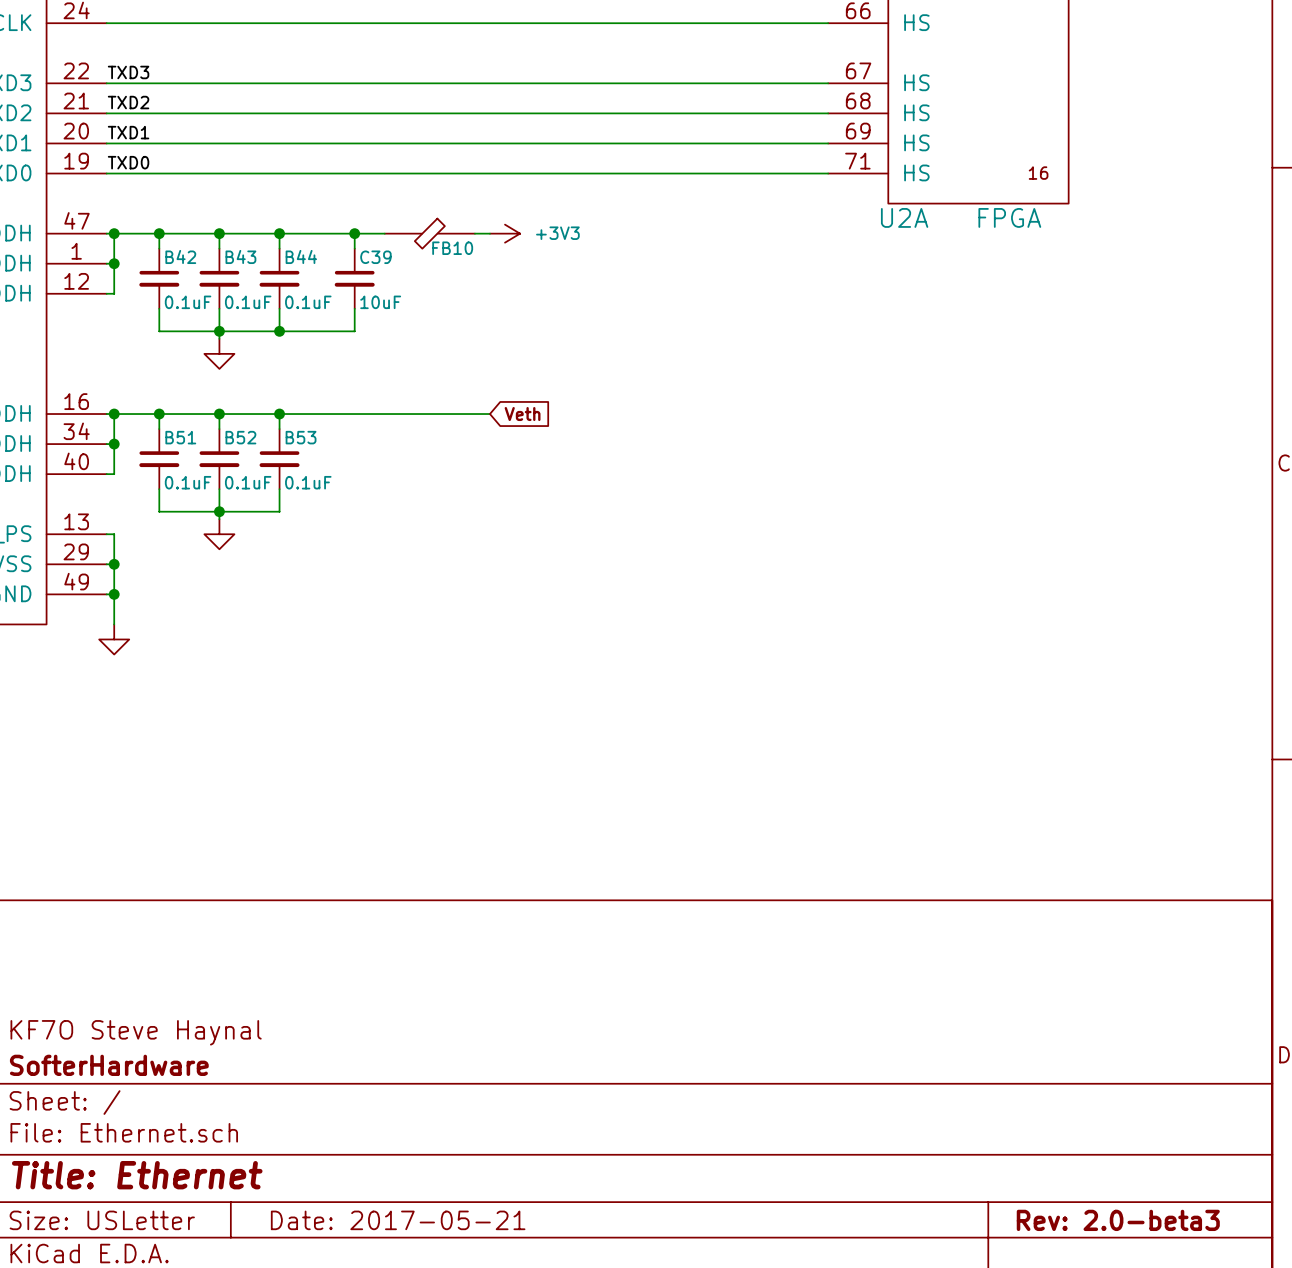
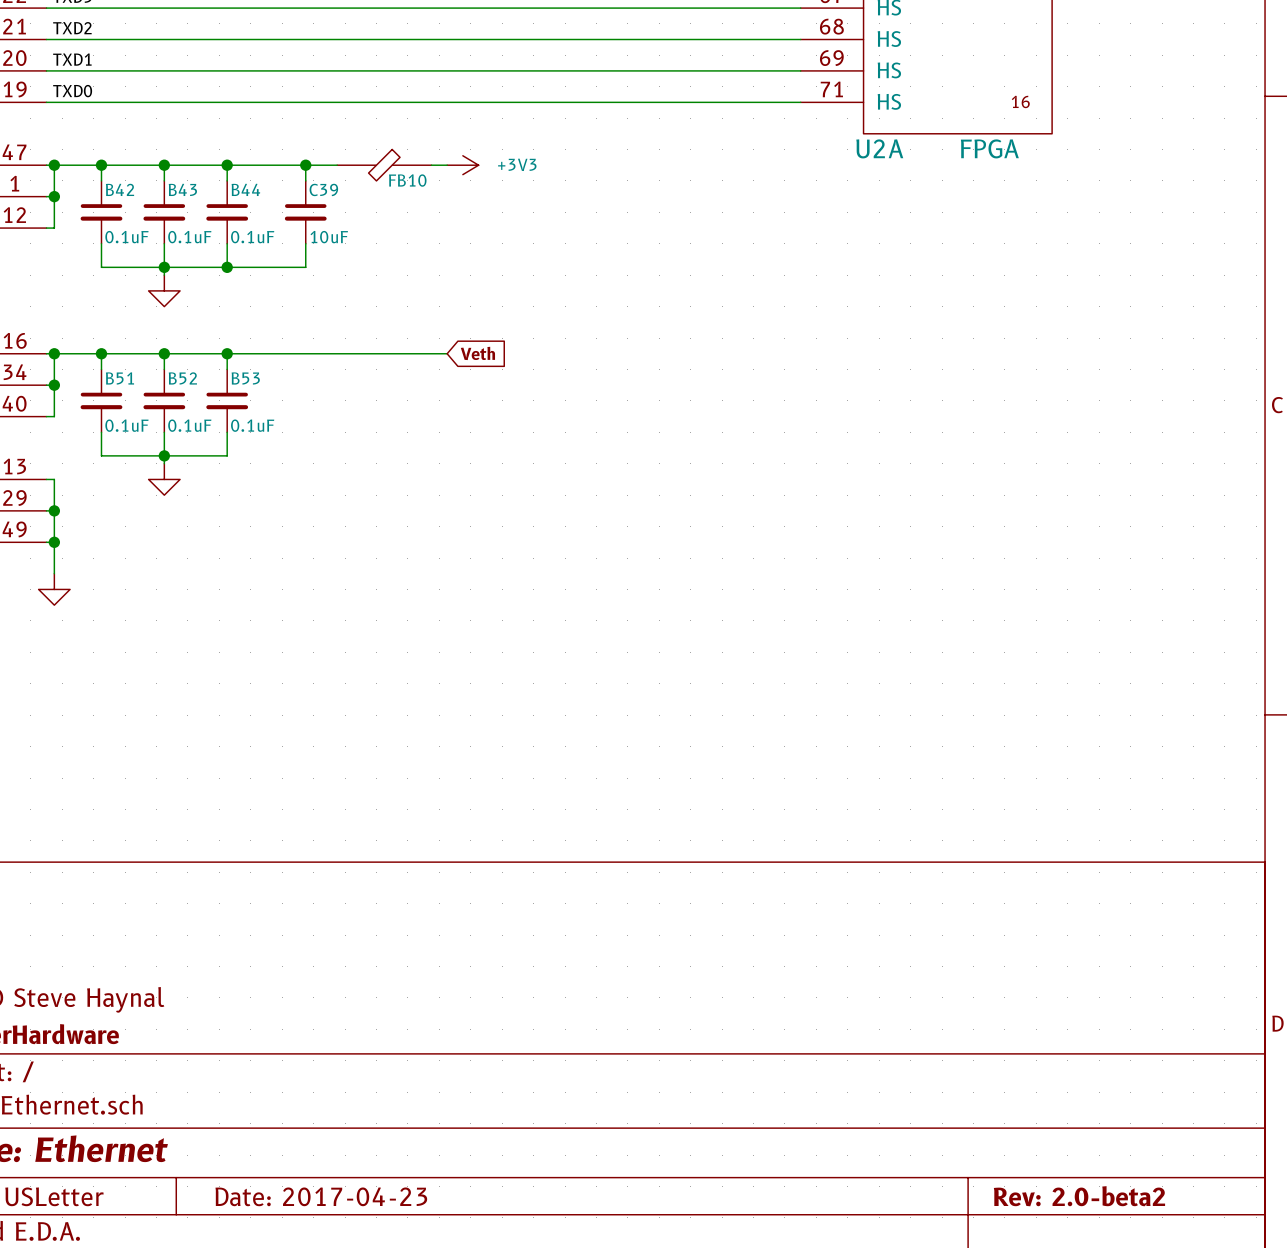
title block: Date: 2017-05-21 (398, 1220) -> Date: 2017-04-23 (321, 1196)
title block: Rev: 2.0-beta3 (1118, 1220) -> Rev: 2.0-beta2 (1079, 1196)

